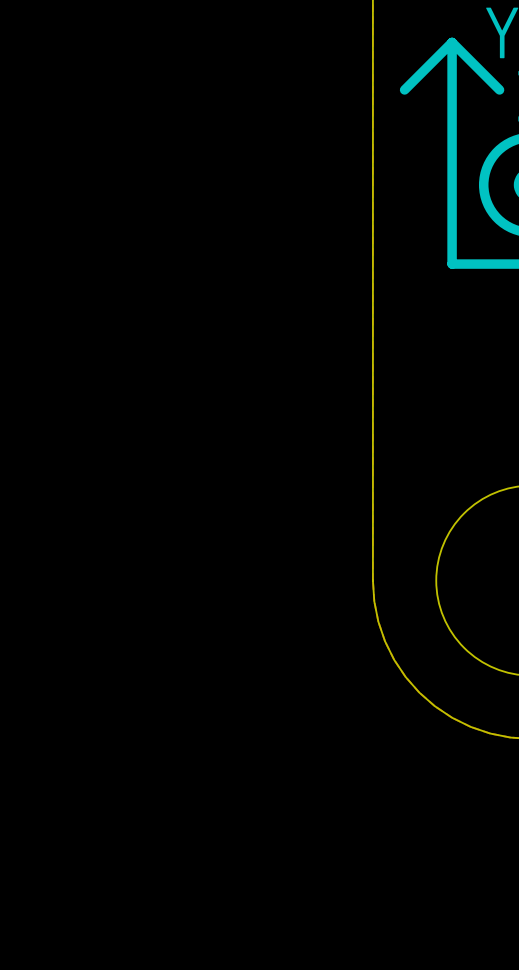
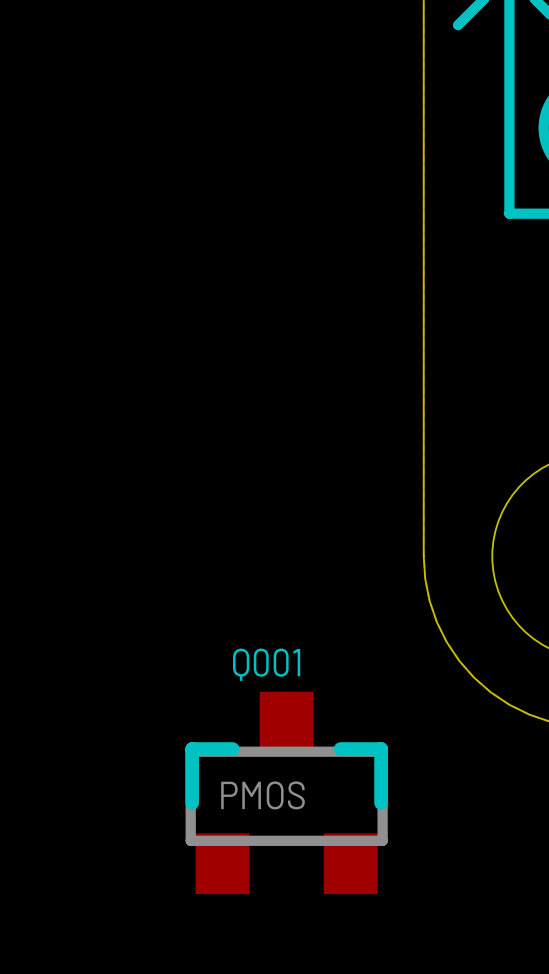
Q001: none -> PMOS (286, 792)

